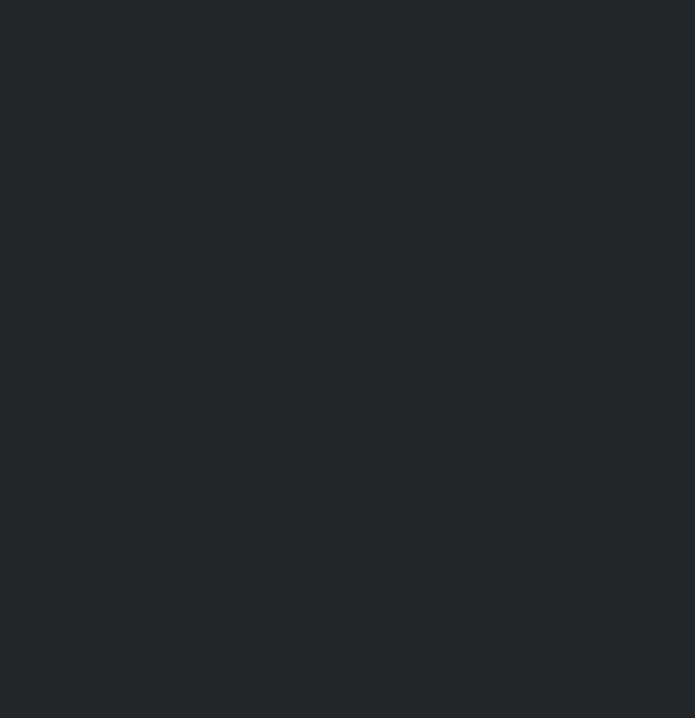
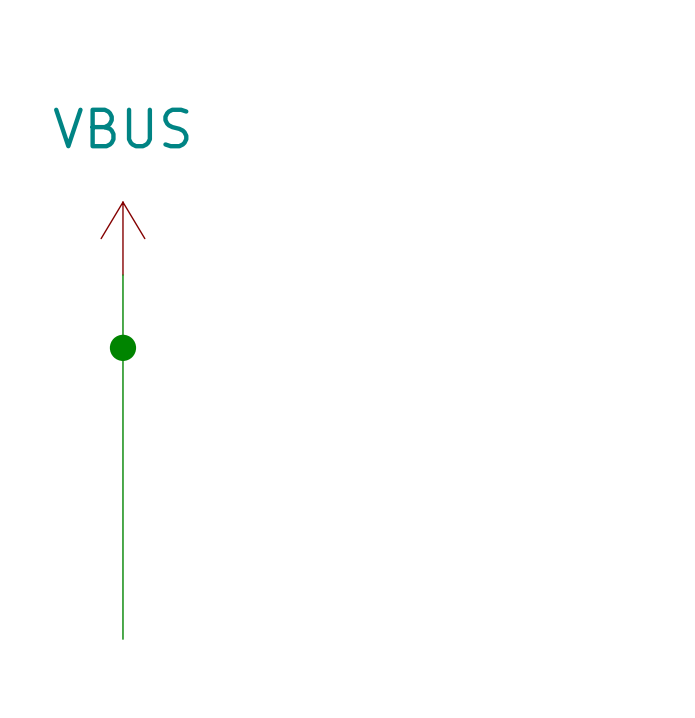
power symbol: none -> VBUS (122, 238)
wire: none -> (122, 275) (122, 639)
junction: none -> (122, 347)

